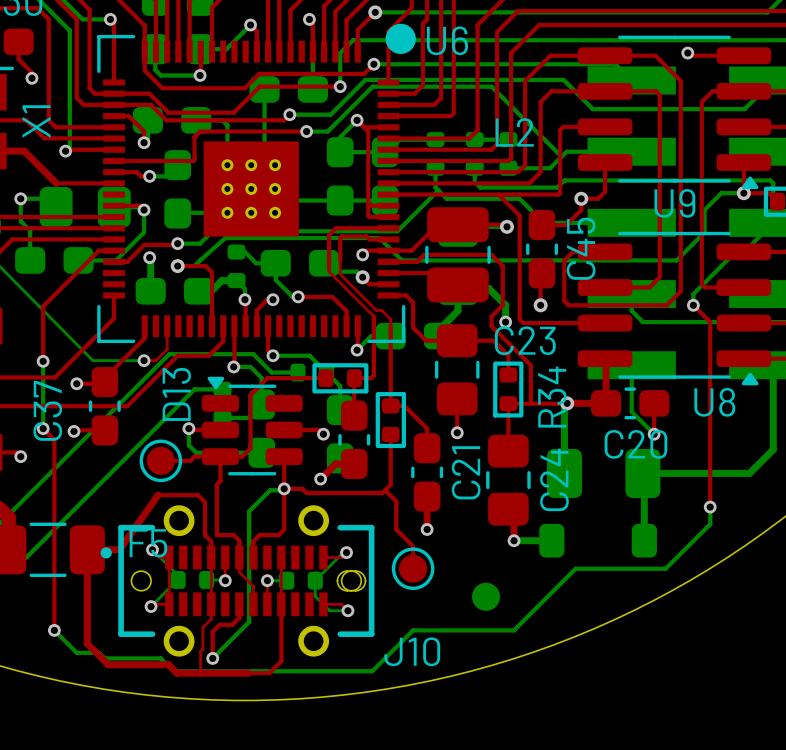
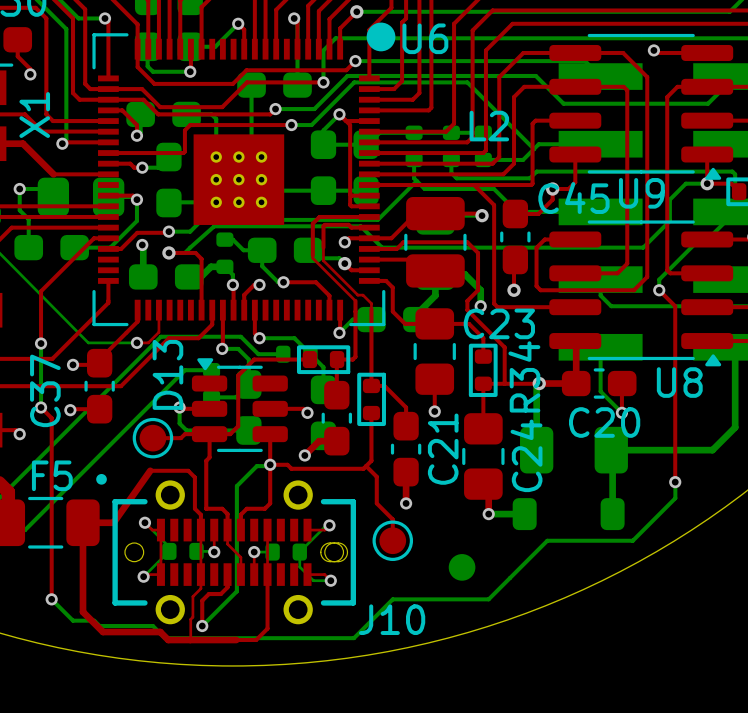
C45 name rotation: 0° (581, 248) -> 90° clockwise (573, 198)
J10 footprint: [100, 505, 375, 657] -> [96, 473, 357, 625]
F5 name position: F5 (148, 543) -> F5 (52, 475)

